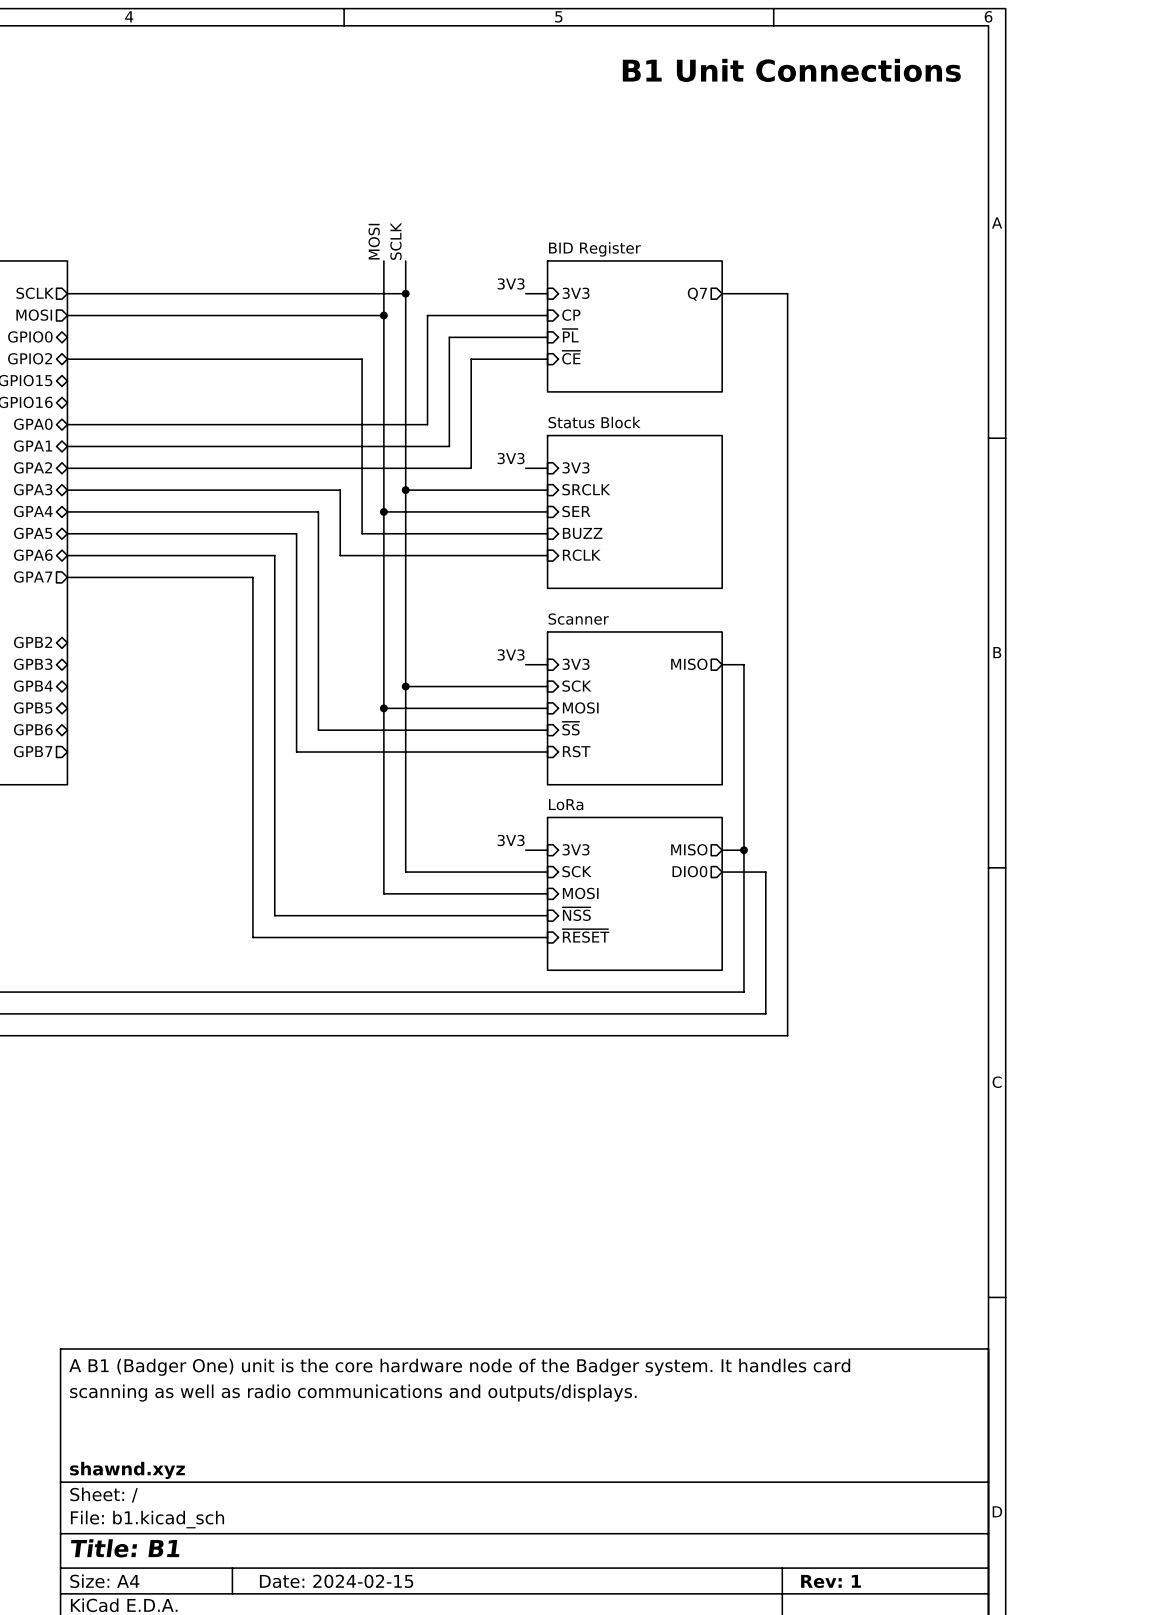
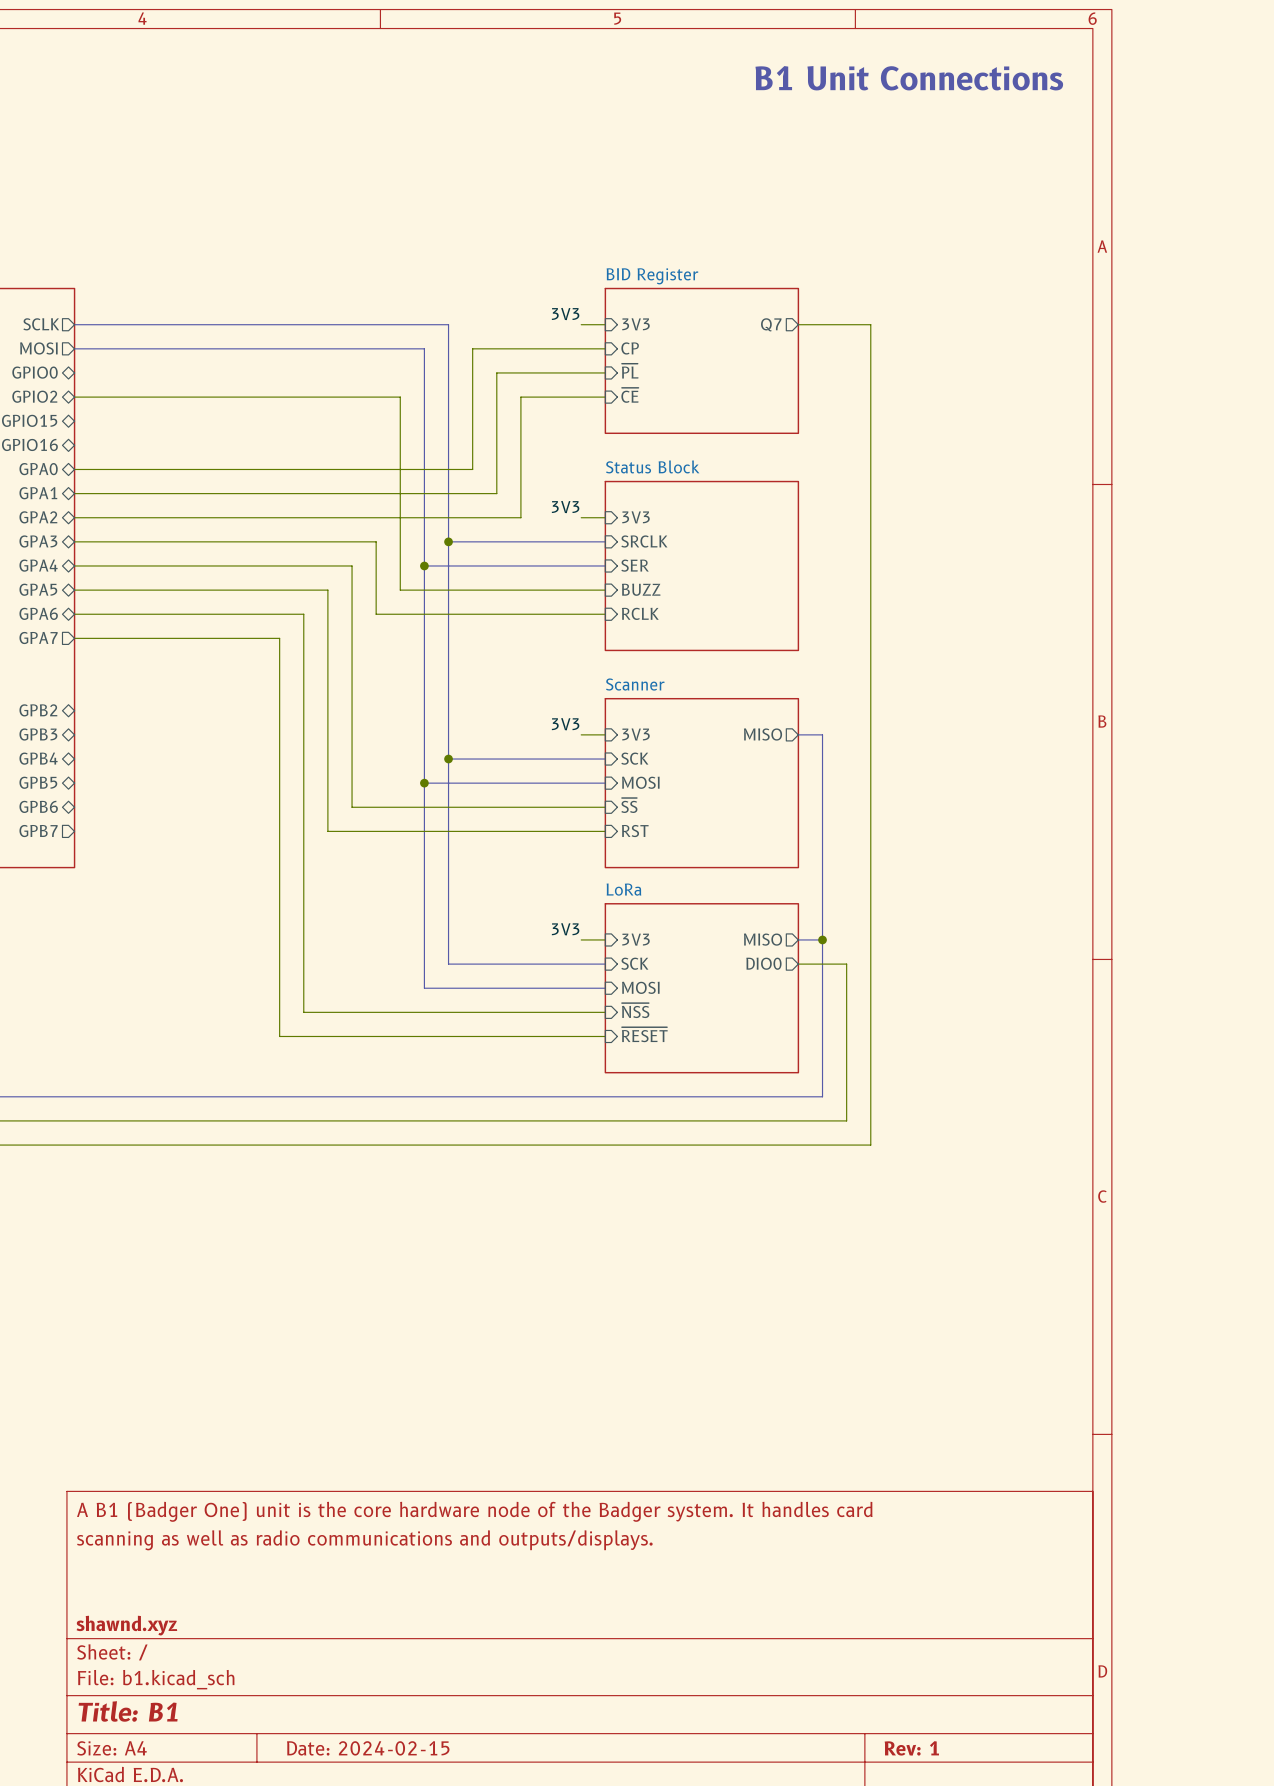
label: MOSI (374, 241) -> none
label: SCLK (395, 241) -> none
bus: (383, 260) (383, 315) -> none
bus: (405, 260) (405, 293) -> none
junction: (405, 293) -> none
junction: (383, 315) -> none

